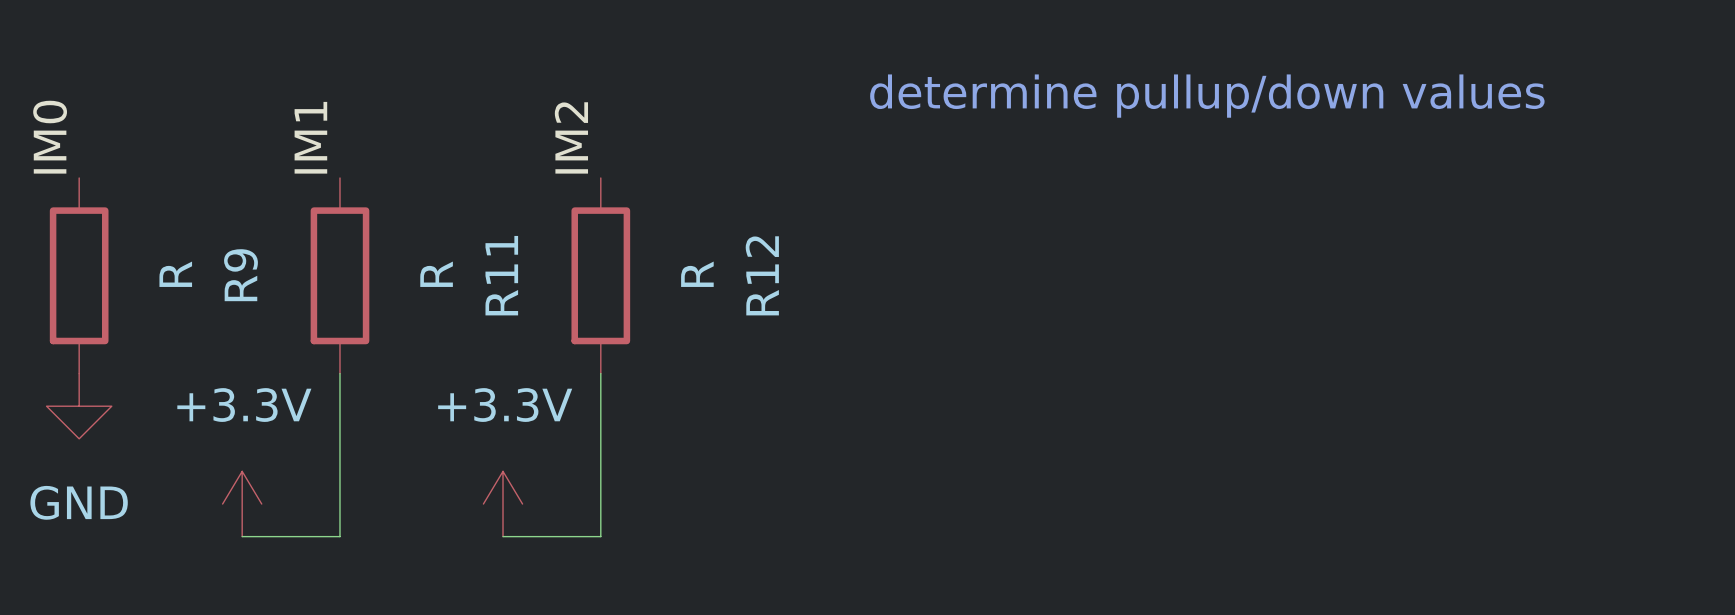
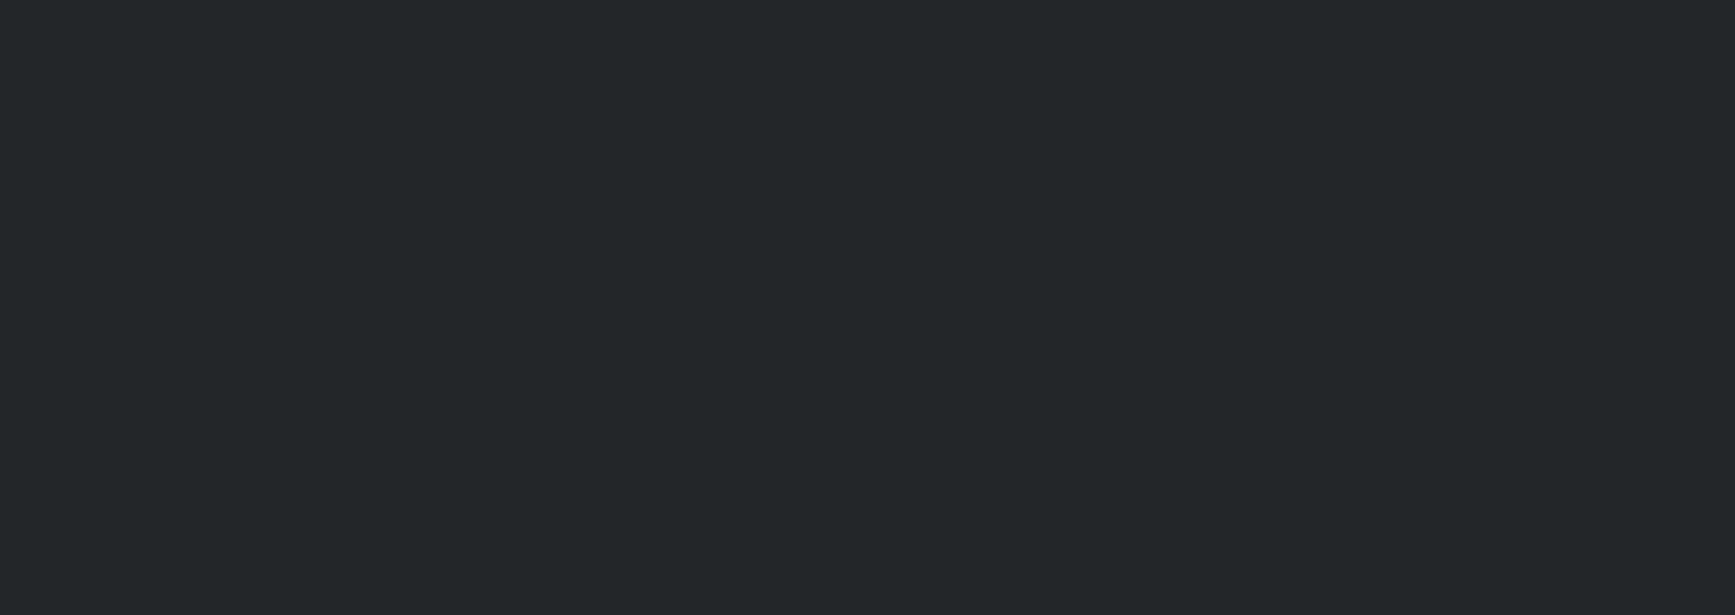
text: determine pullup/down values (1207, 96) -> none
label: IM0 (50, 137) -> none
label: IM1 (310, 137) -> none
label: IM2 (571, 137) -> none
R9: R (79, 275) -> none
R11: R (339, 275) -> none
R12: R (600, 275) -> none
wire: (339, 373) (339, 536) (242, 536) -> none
wire: (600, 373) (600, 536) (503, 536) -> none
power symbol: GND (79, 406) -> none
power symbol: +3.3V (242, 504) -> none
power symbol: +3.3V (503, 504) -> none

